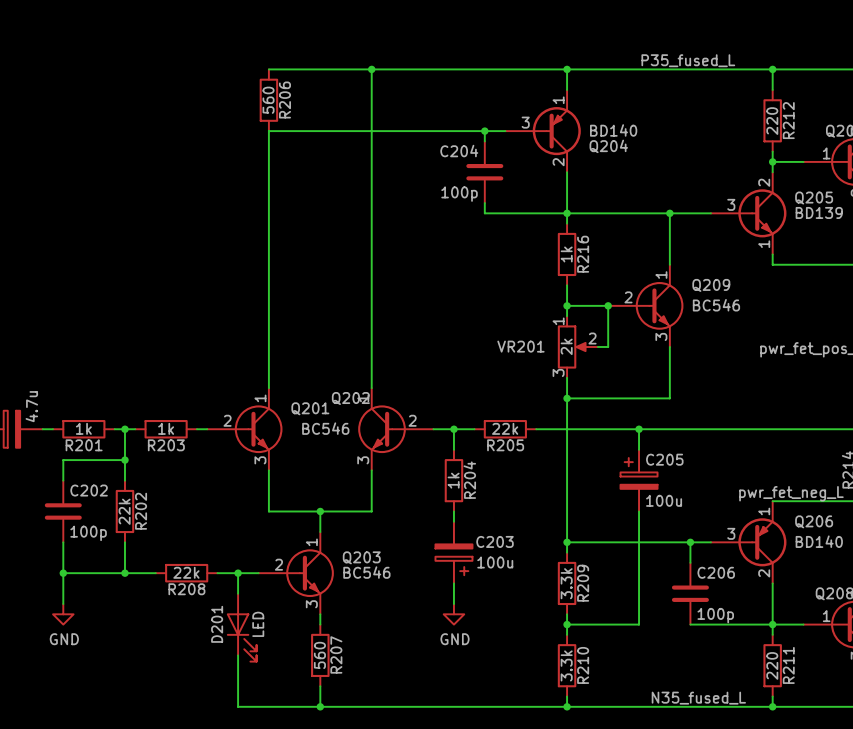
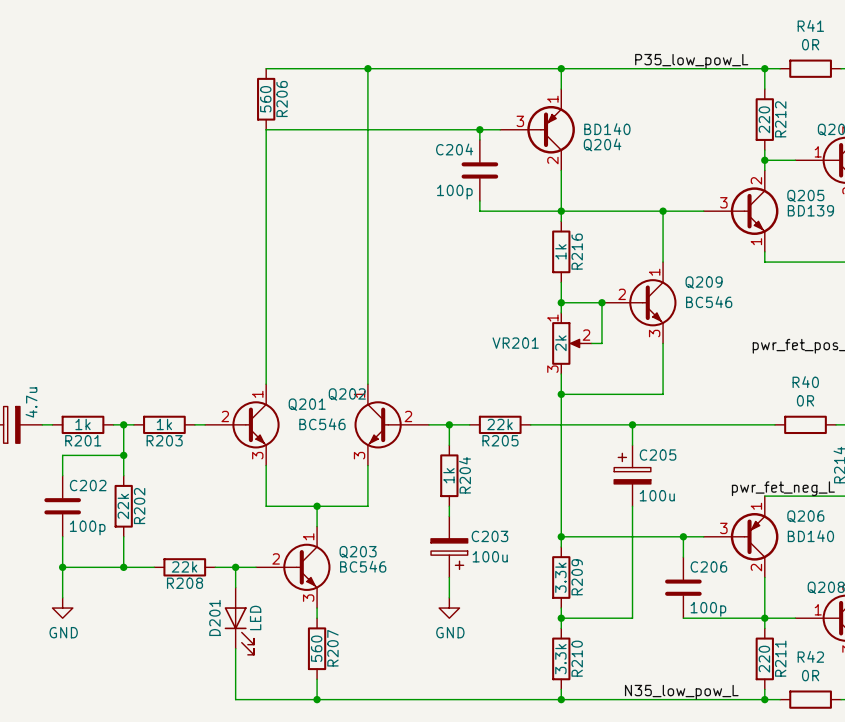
label: P35_fused_L (688, 60) -> P35_low_pow_L (691, 61)
wire: (788, 69) (849, 69) -> none
R41: none -> 0R (810, 68)
wire: (782, 429) (844, 429) -> none
R40: none -> 0R (805, 424)
label: N35_fused_L (698, 698) -> none
label: none -> N35_low_pow_L (681, 692)
wire: (788, 706) (849, 706) -> none
R42: none -> 0R (810, 699)

